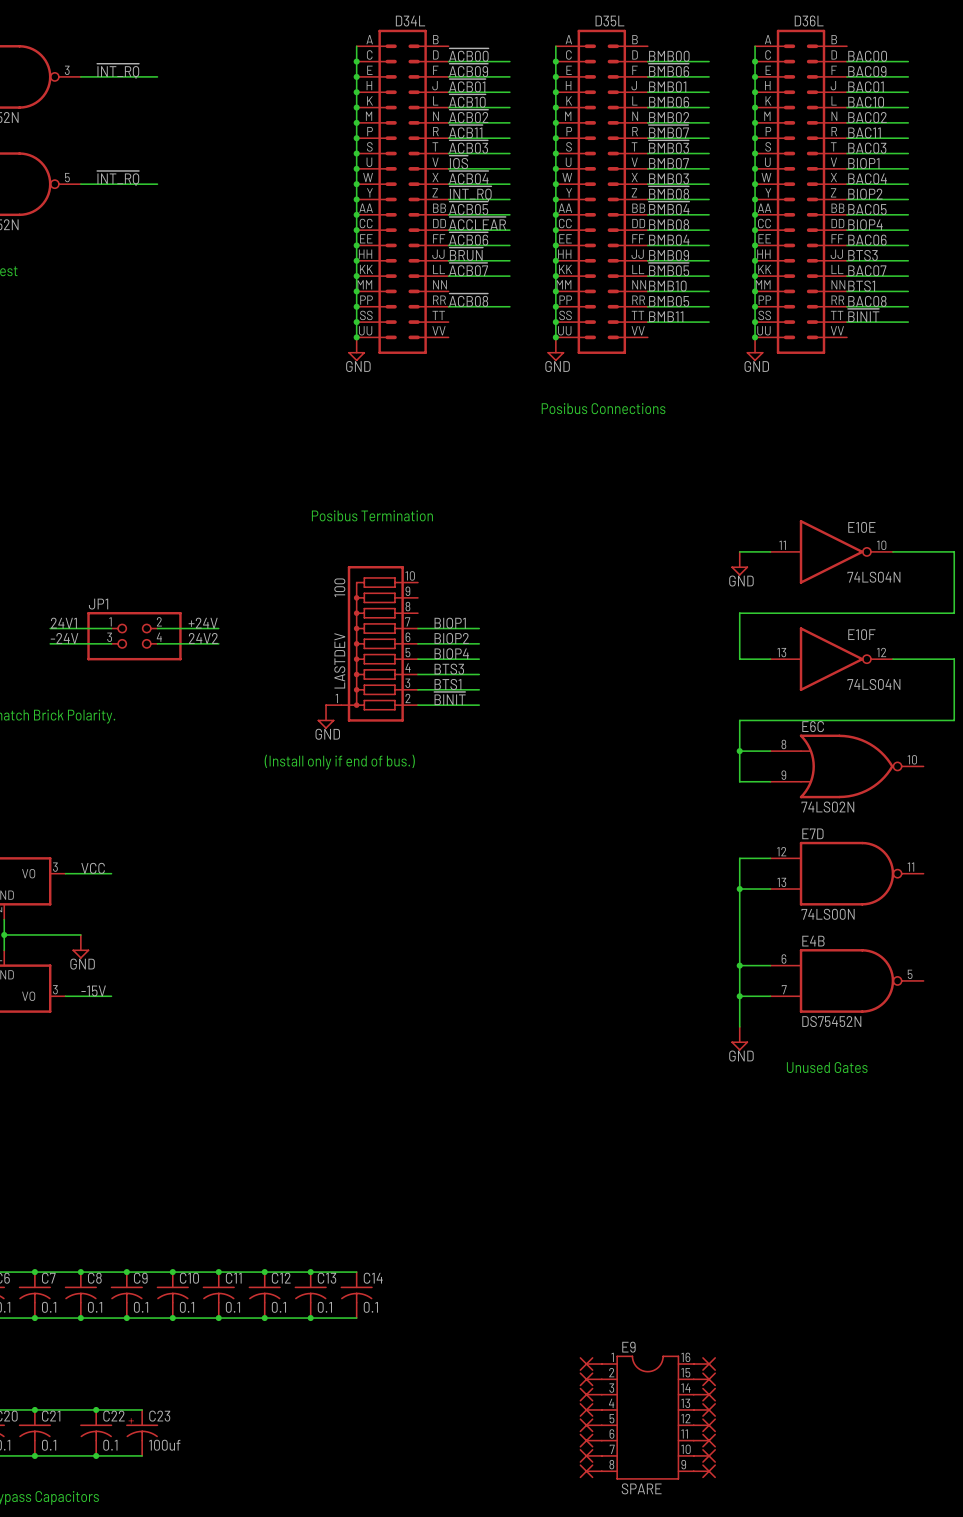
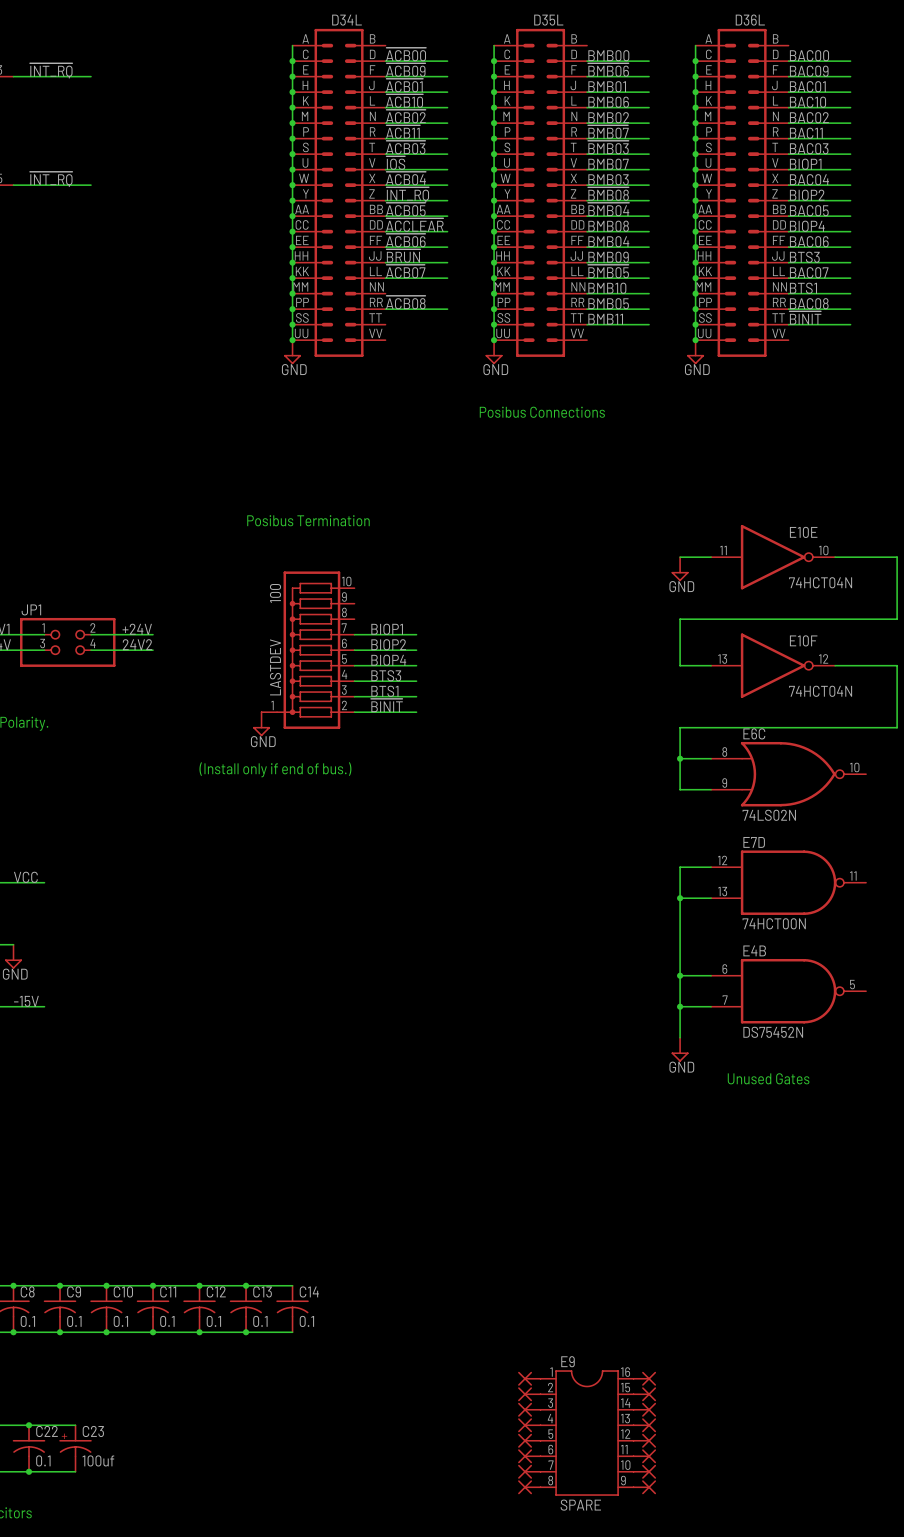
E10E value: 74LS04N (873, 577) -> 74HCT04N (820, 582)
E10F value: 74LS04N (873, 684) -> 74HCT04N (820, 691)
E7D value: 74LS00N (828, 914) -> 74HCT00N (774, 923)

